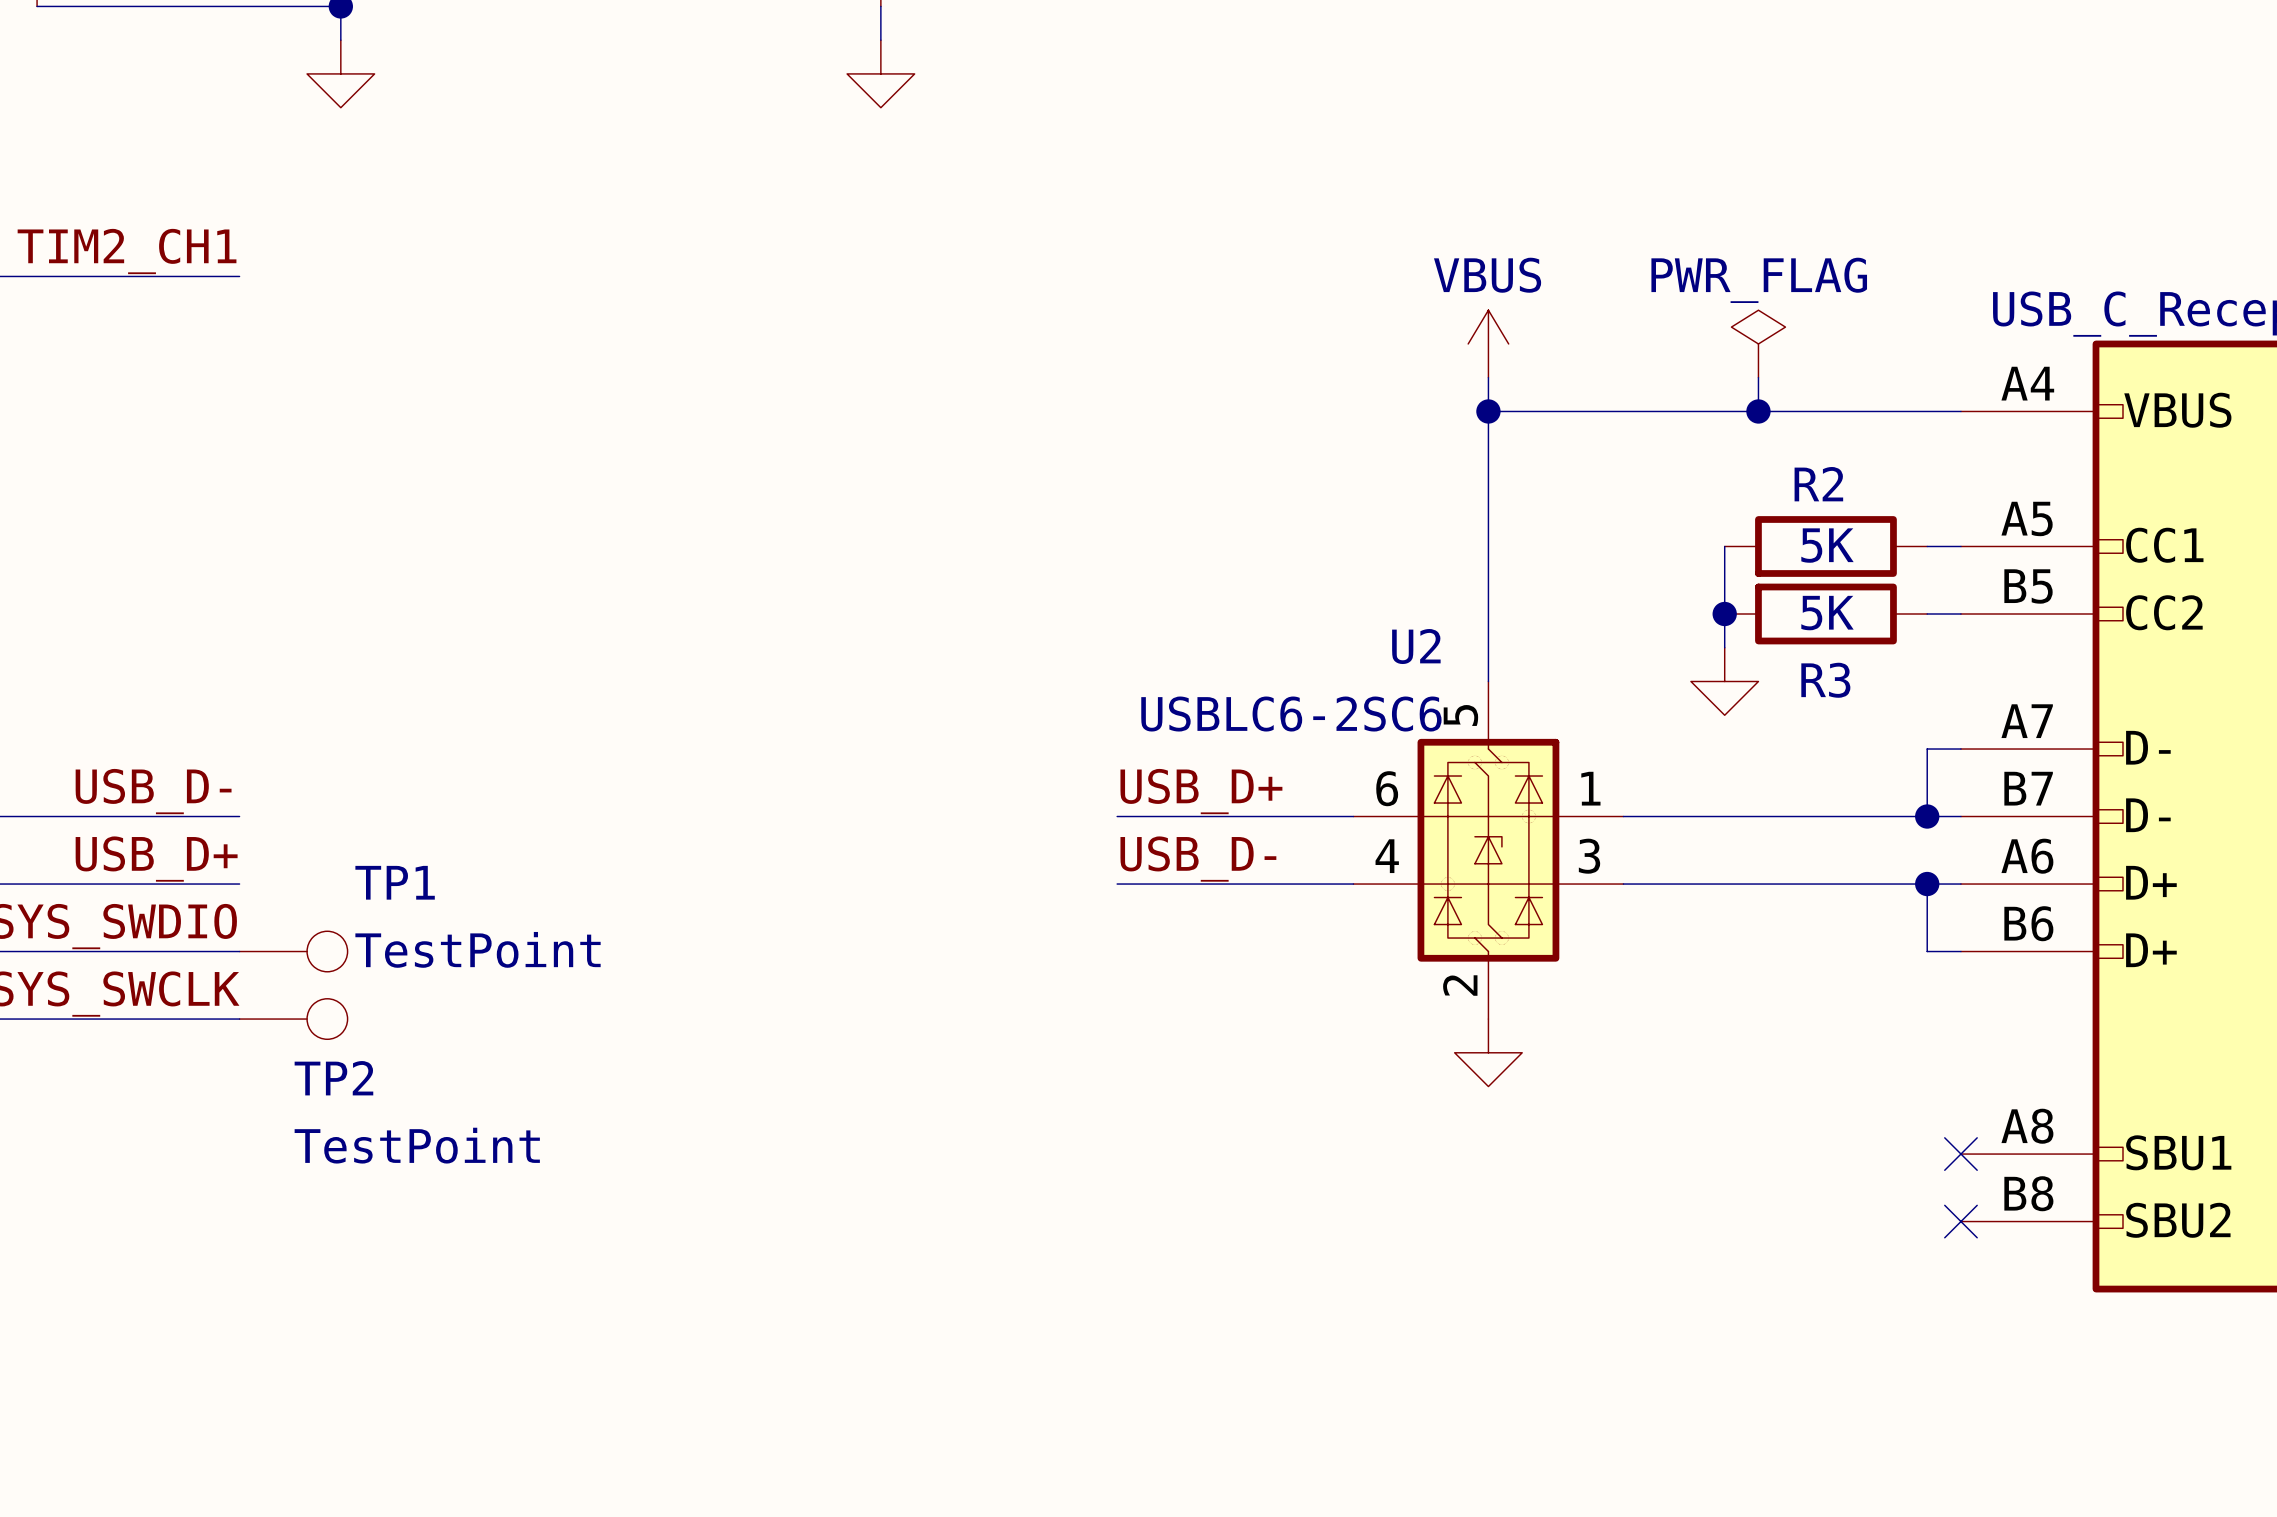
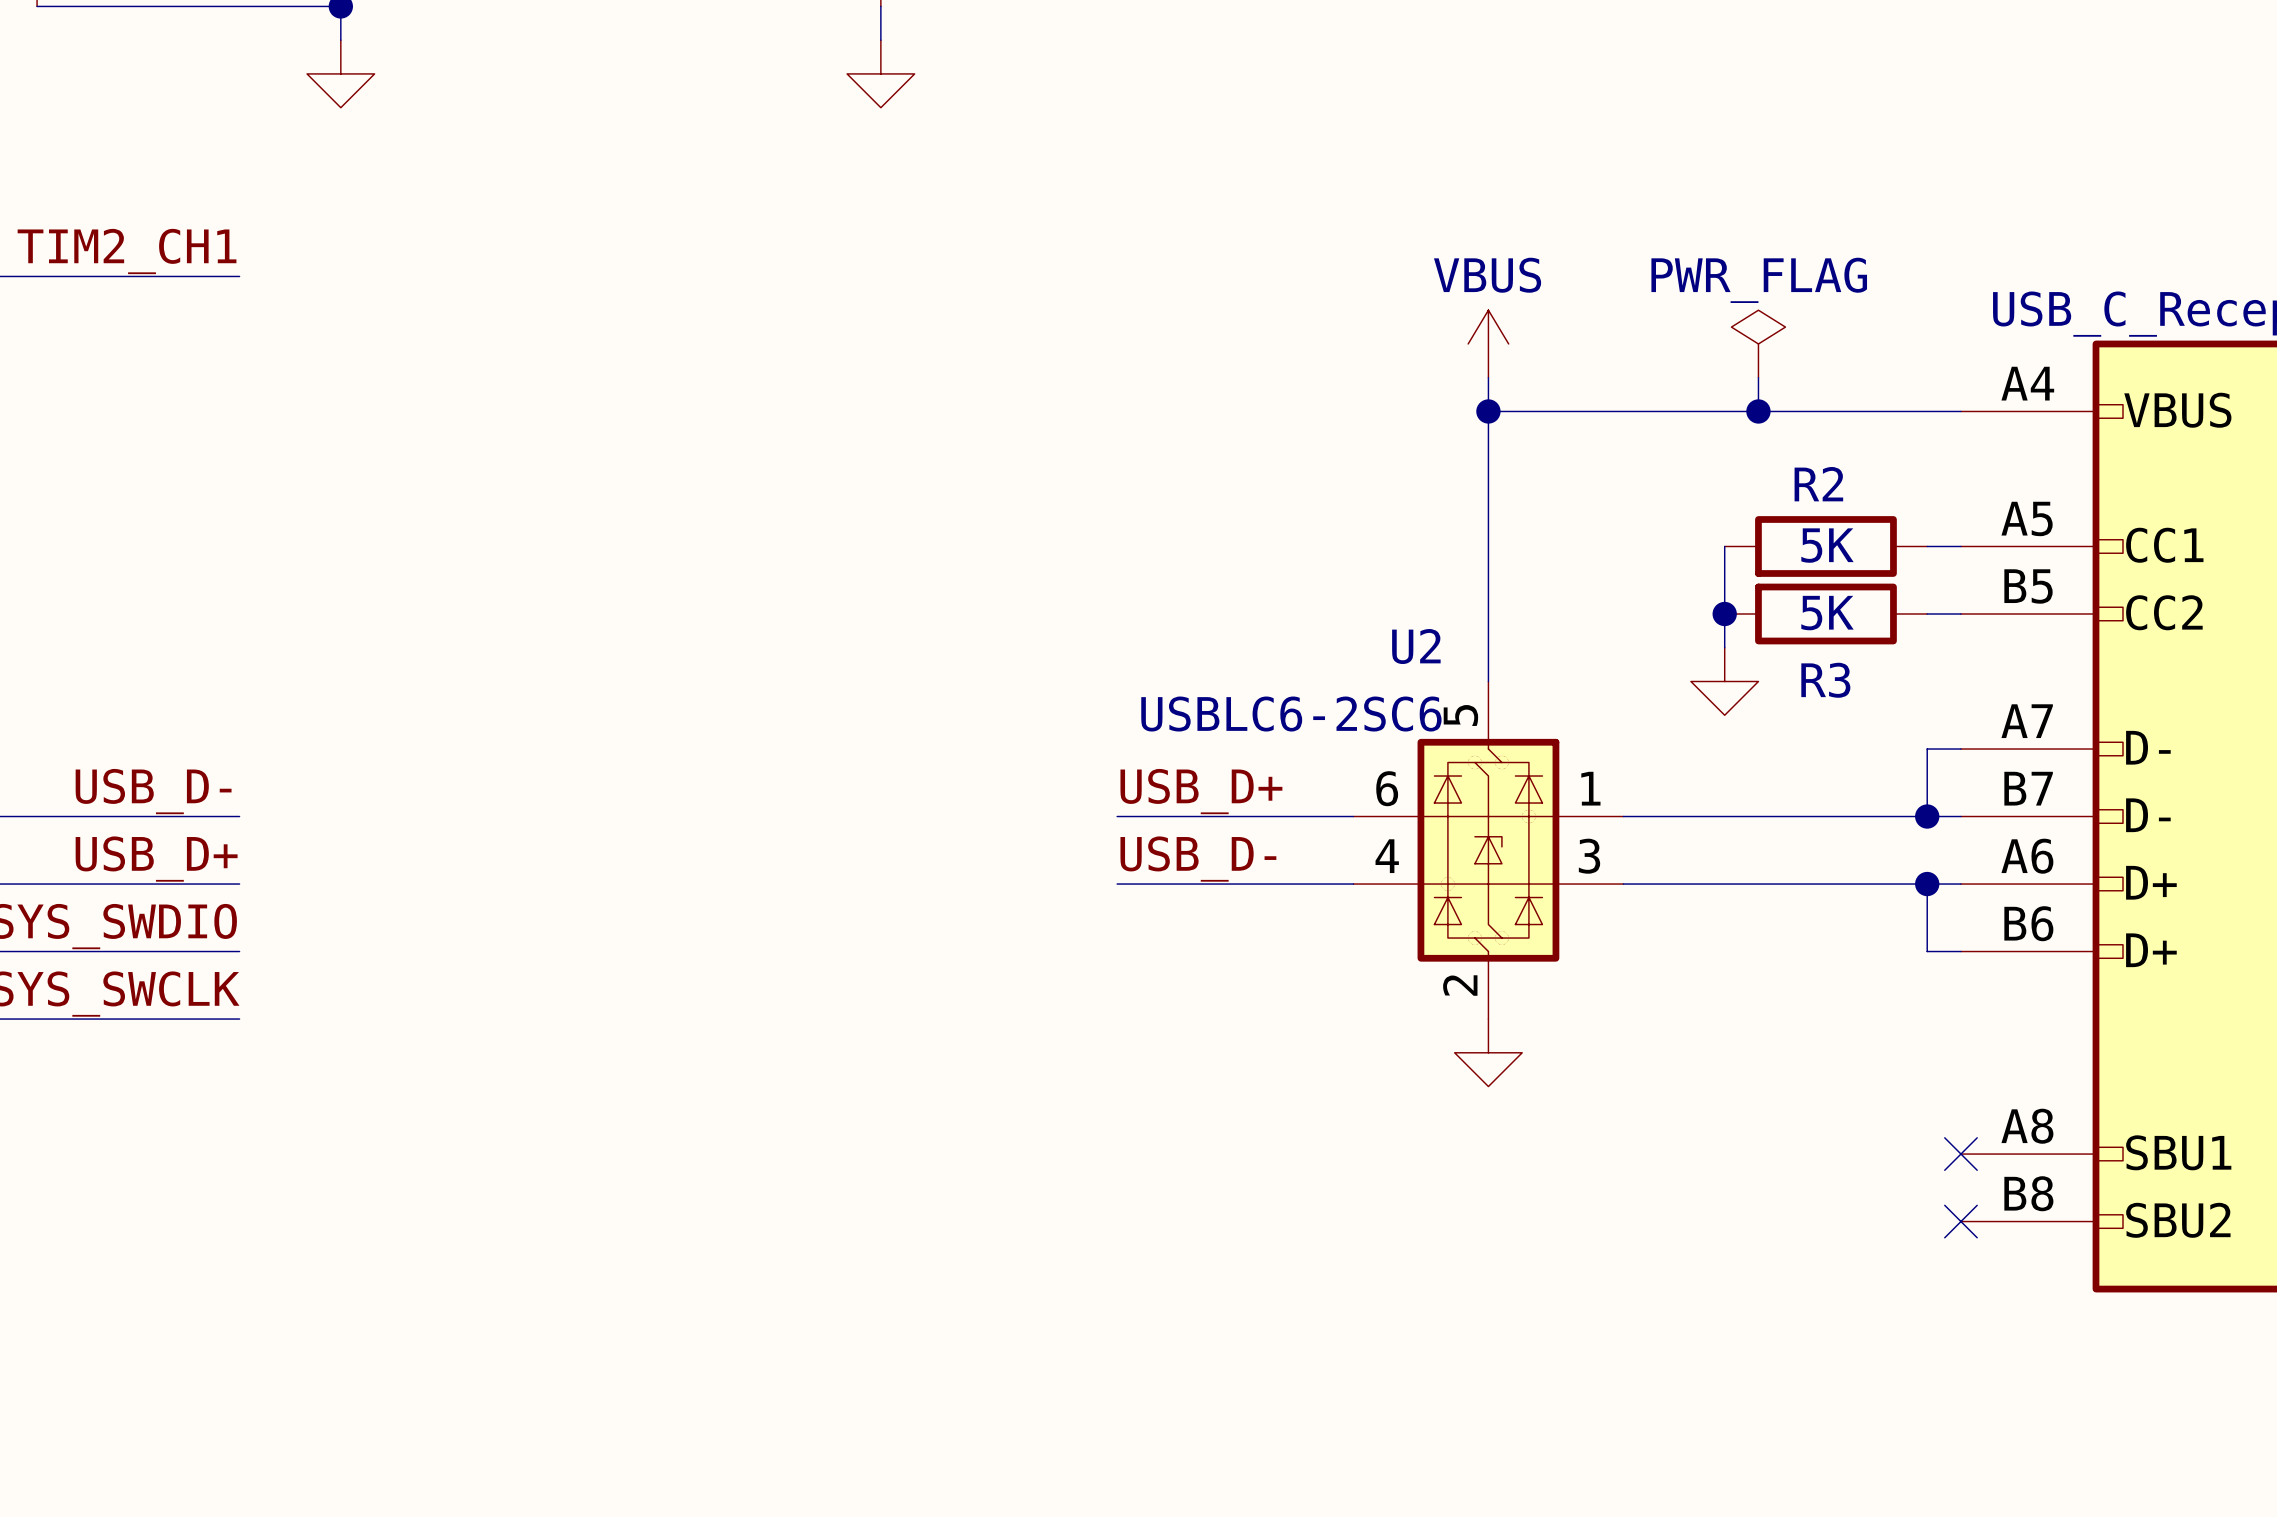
TP1: TestPoint (293, 951) -> none
TP2: TestPoint (293, 1019) -> none

